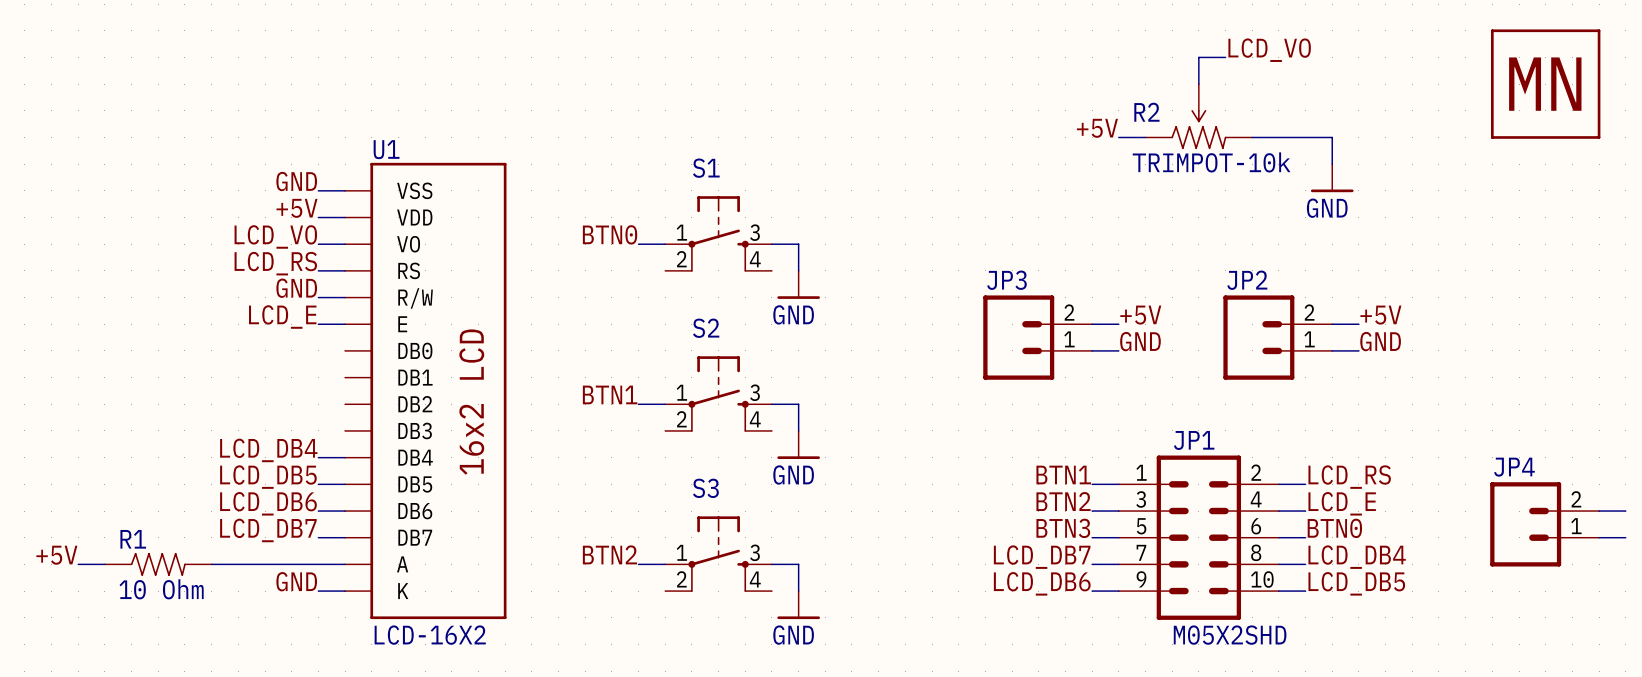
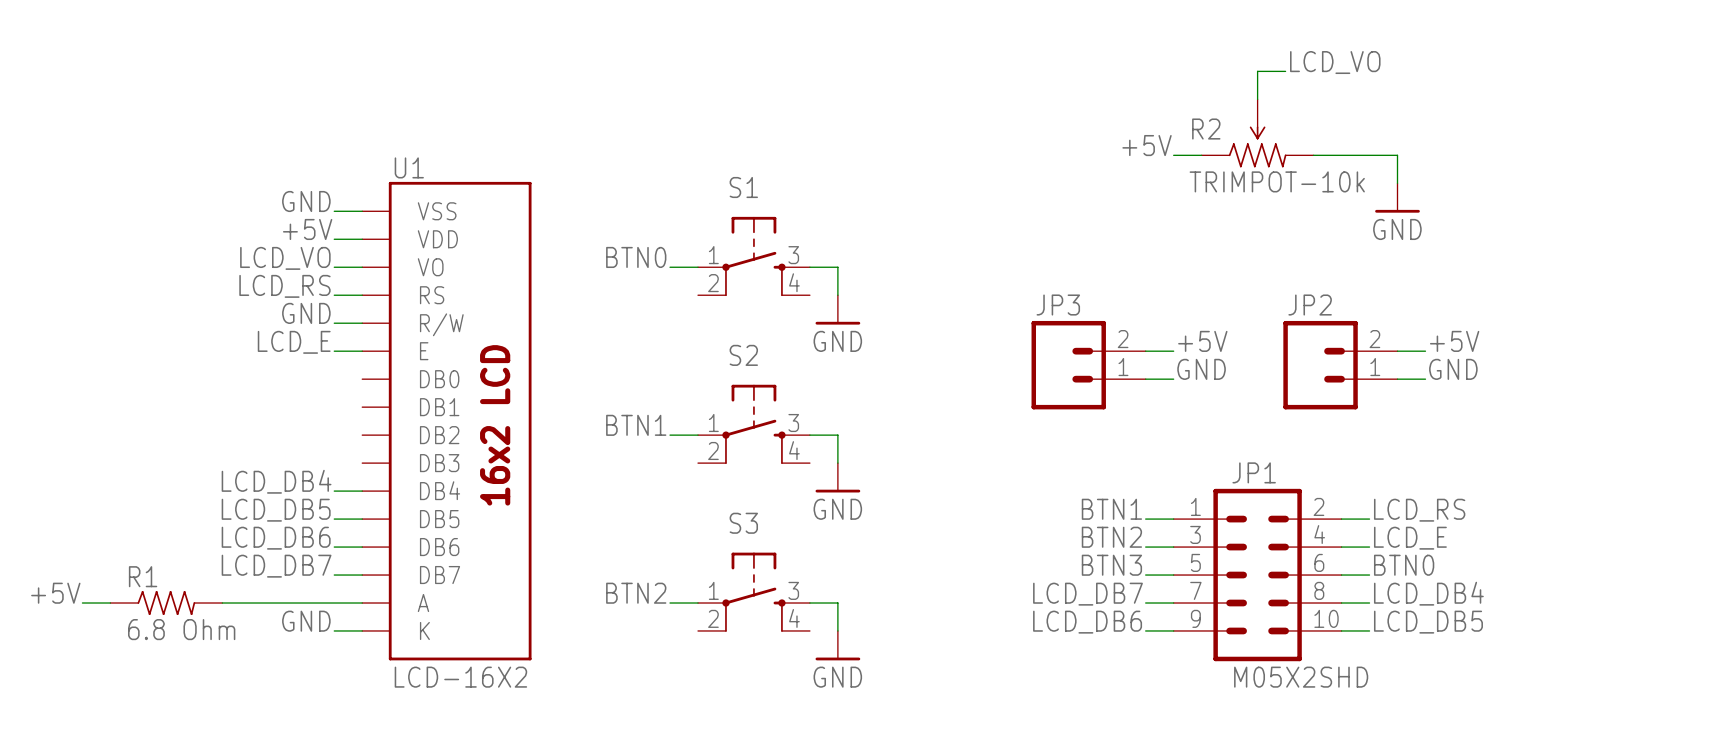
part: (1545, 84) -> none
wire: (1599, 511) (1625, 511) -> none
JP4: (1544, 524) -> none
wire: (1599, 537) (1625, 537) -> none
R1 value: 10 Ohm (161, 589) -> 6.8 Ohm (181, 629)

